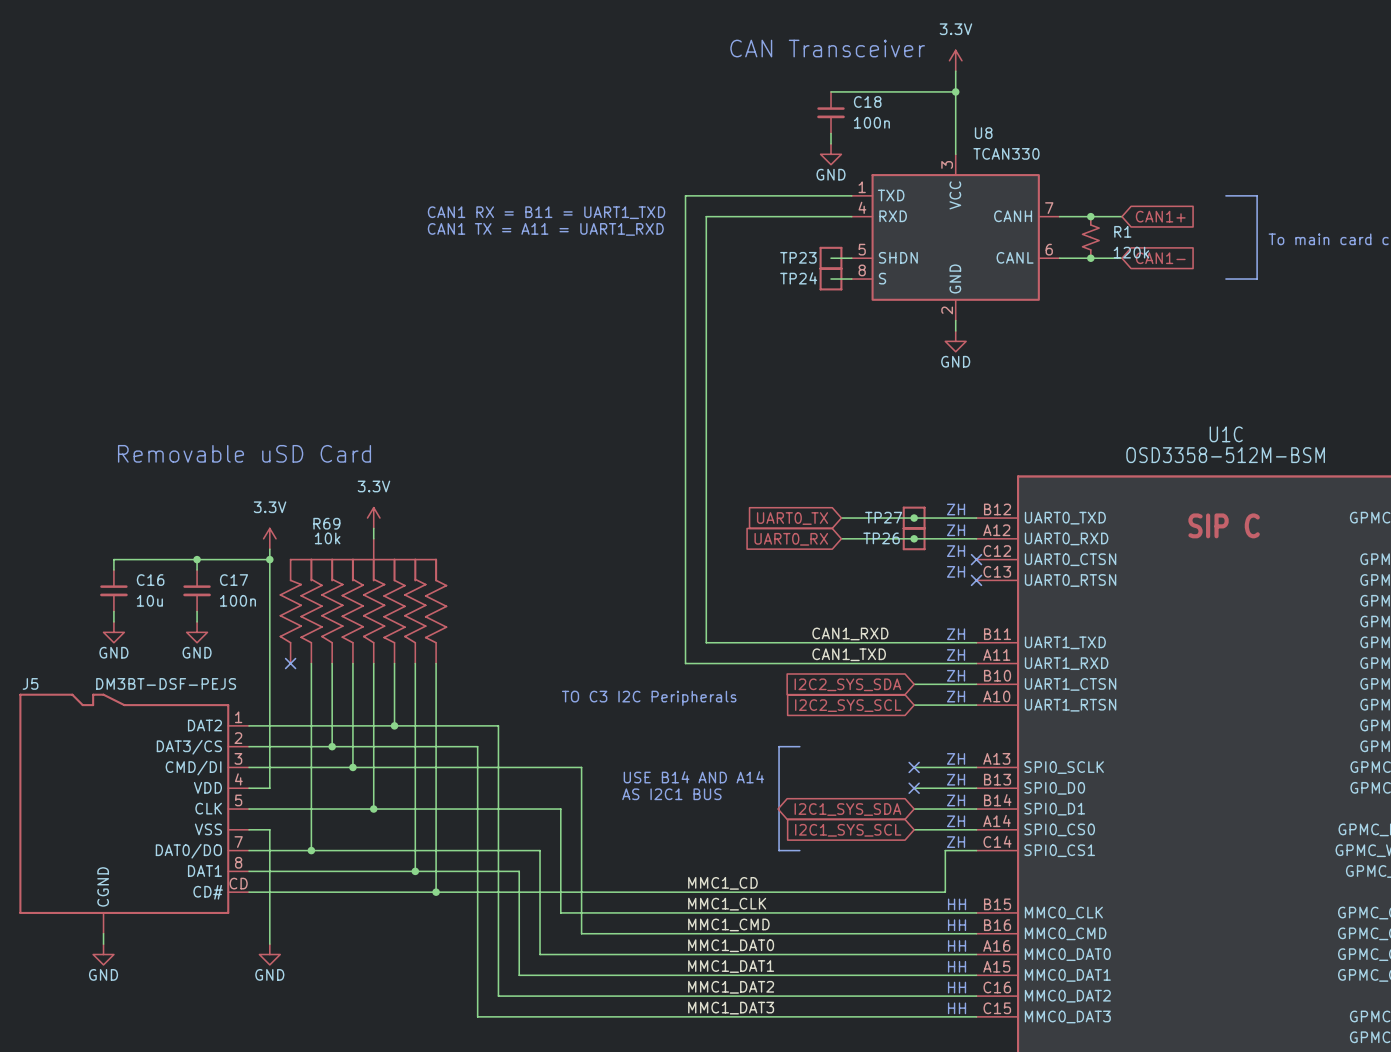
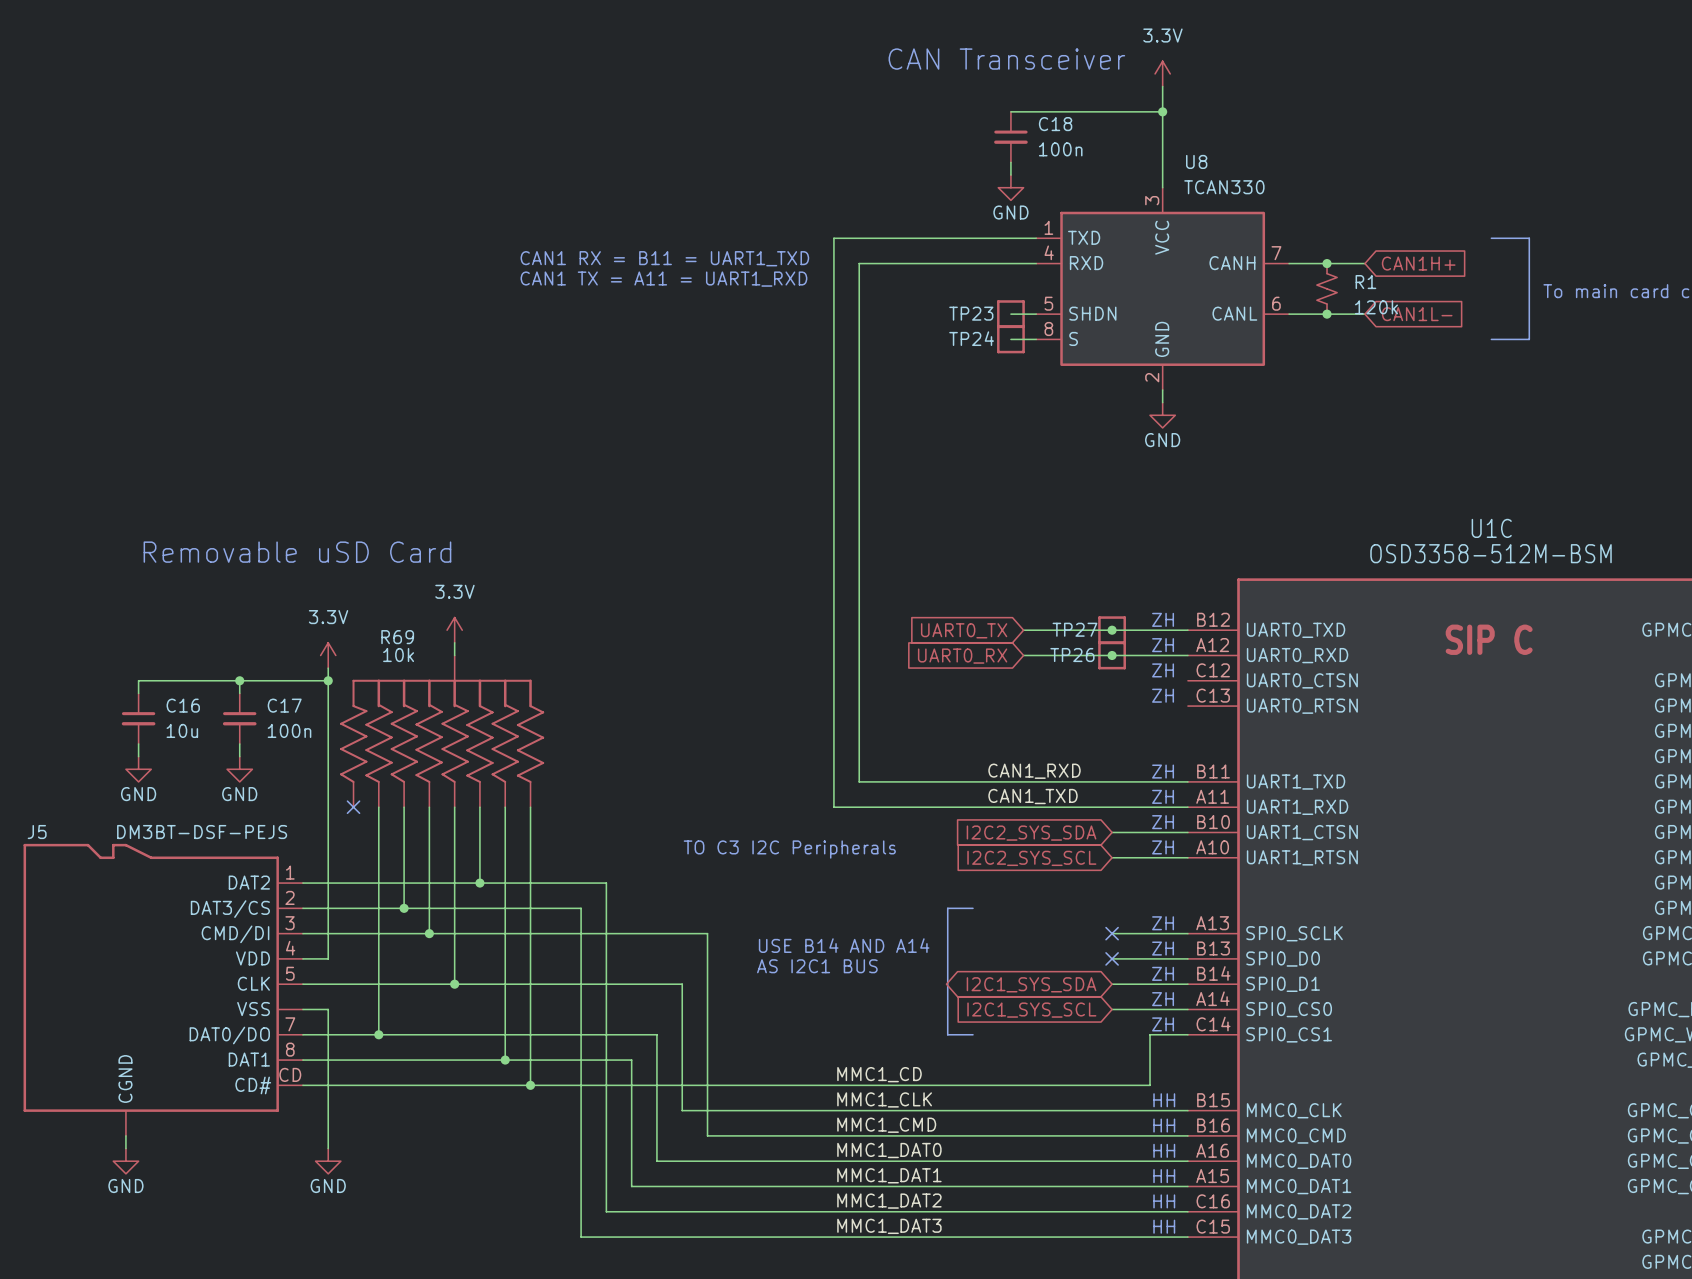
global label: CAN1+ (1160, 216) -> CAN1H+ (1418, 263)
global label: CAN1- (1160, 258) -> CAN1L- (1417, 314)
no-connect mark: (976, 559) -> none
no-connect mark: (976, 580) -> none

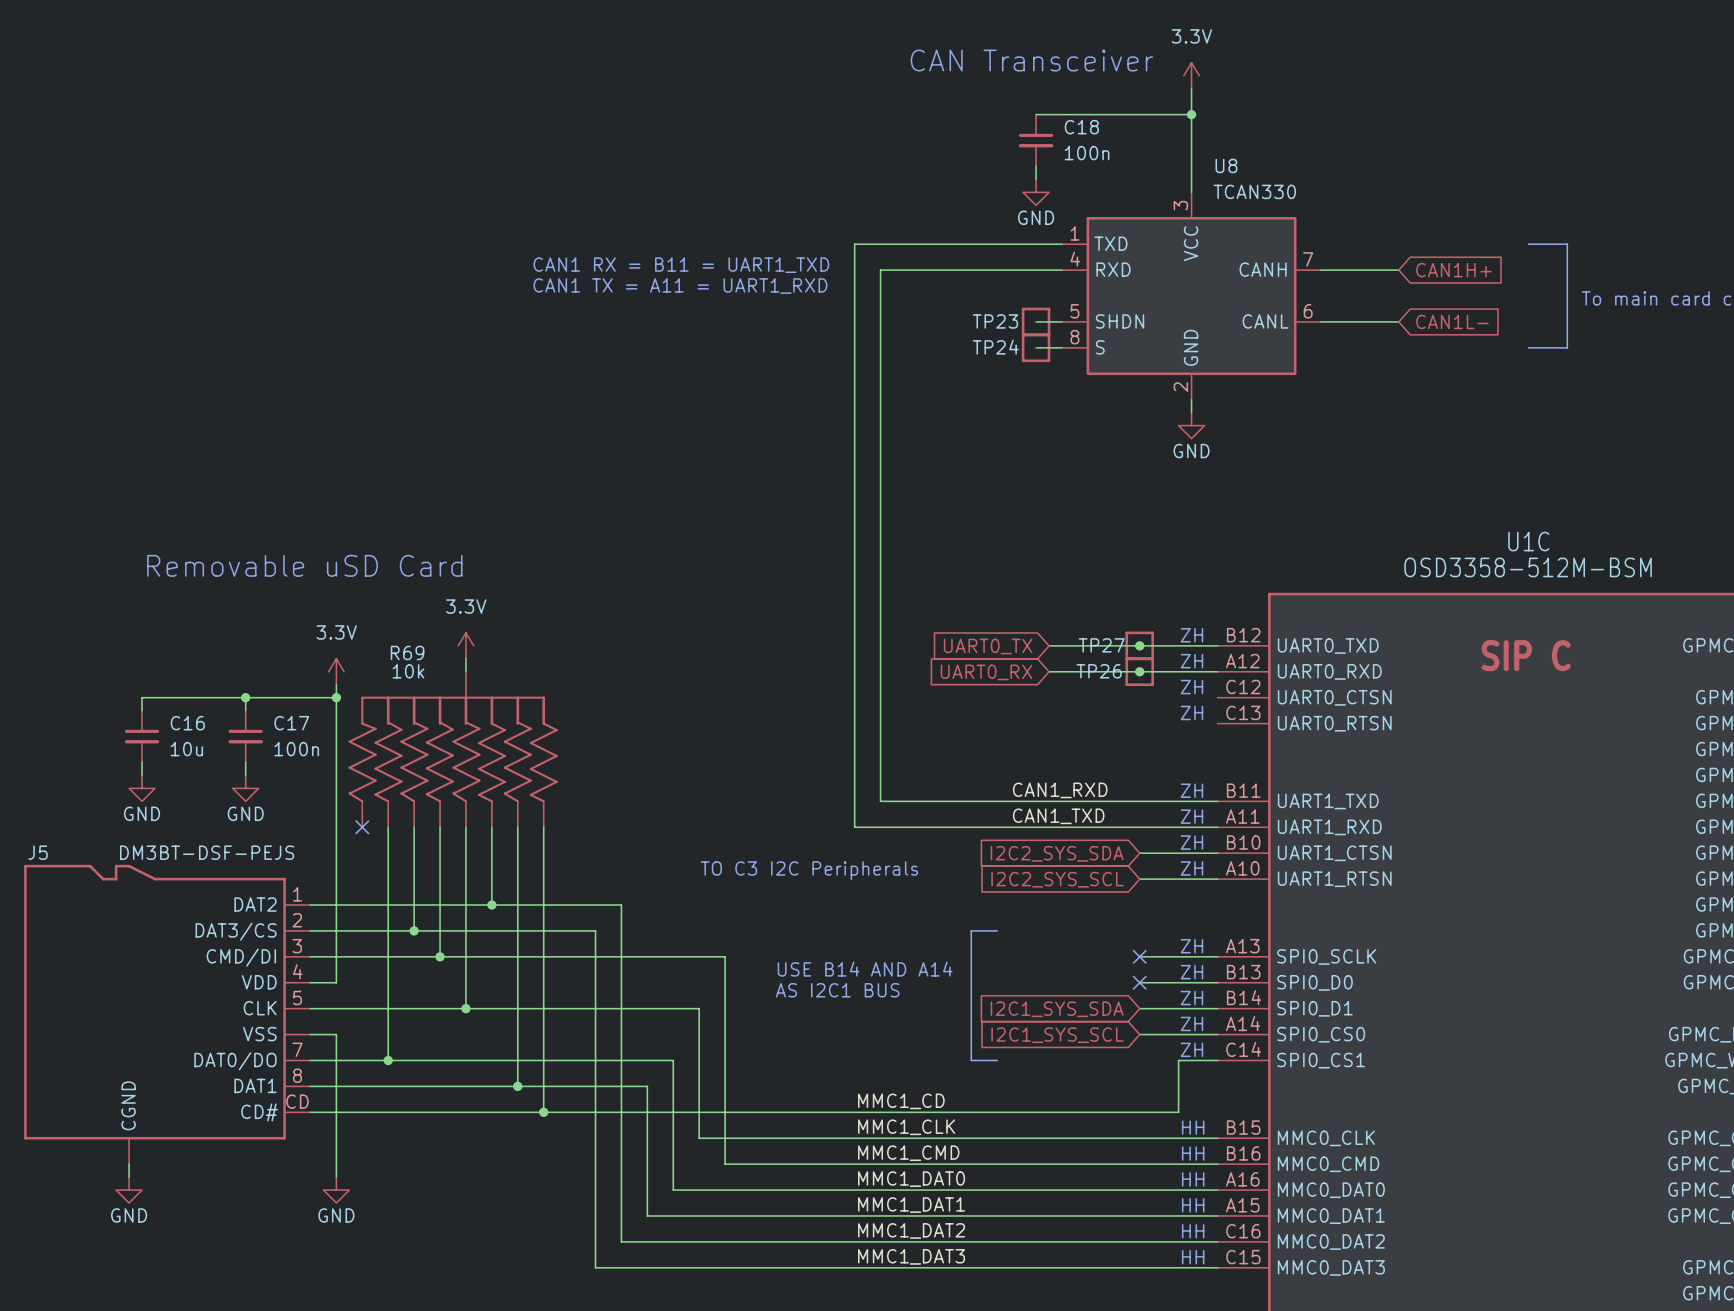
junction: (1327, 263) -> none
R1: 120k (1327, 288) -> none
junction: (1327, 314) -> none
global label shape: bidirectional (1031, 984) -> input (1057, 1009)

